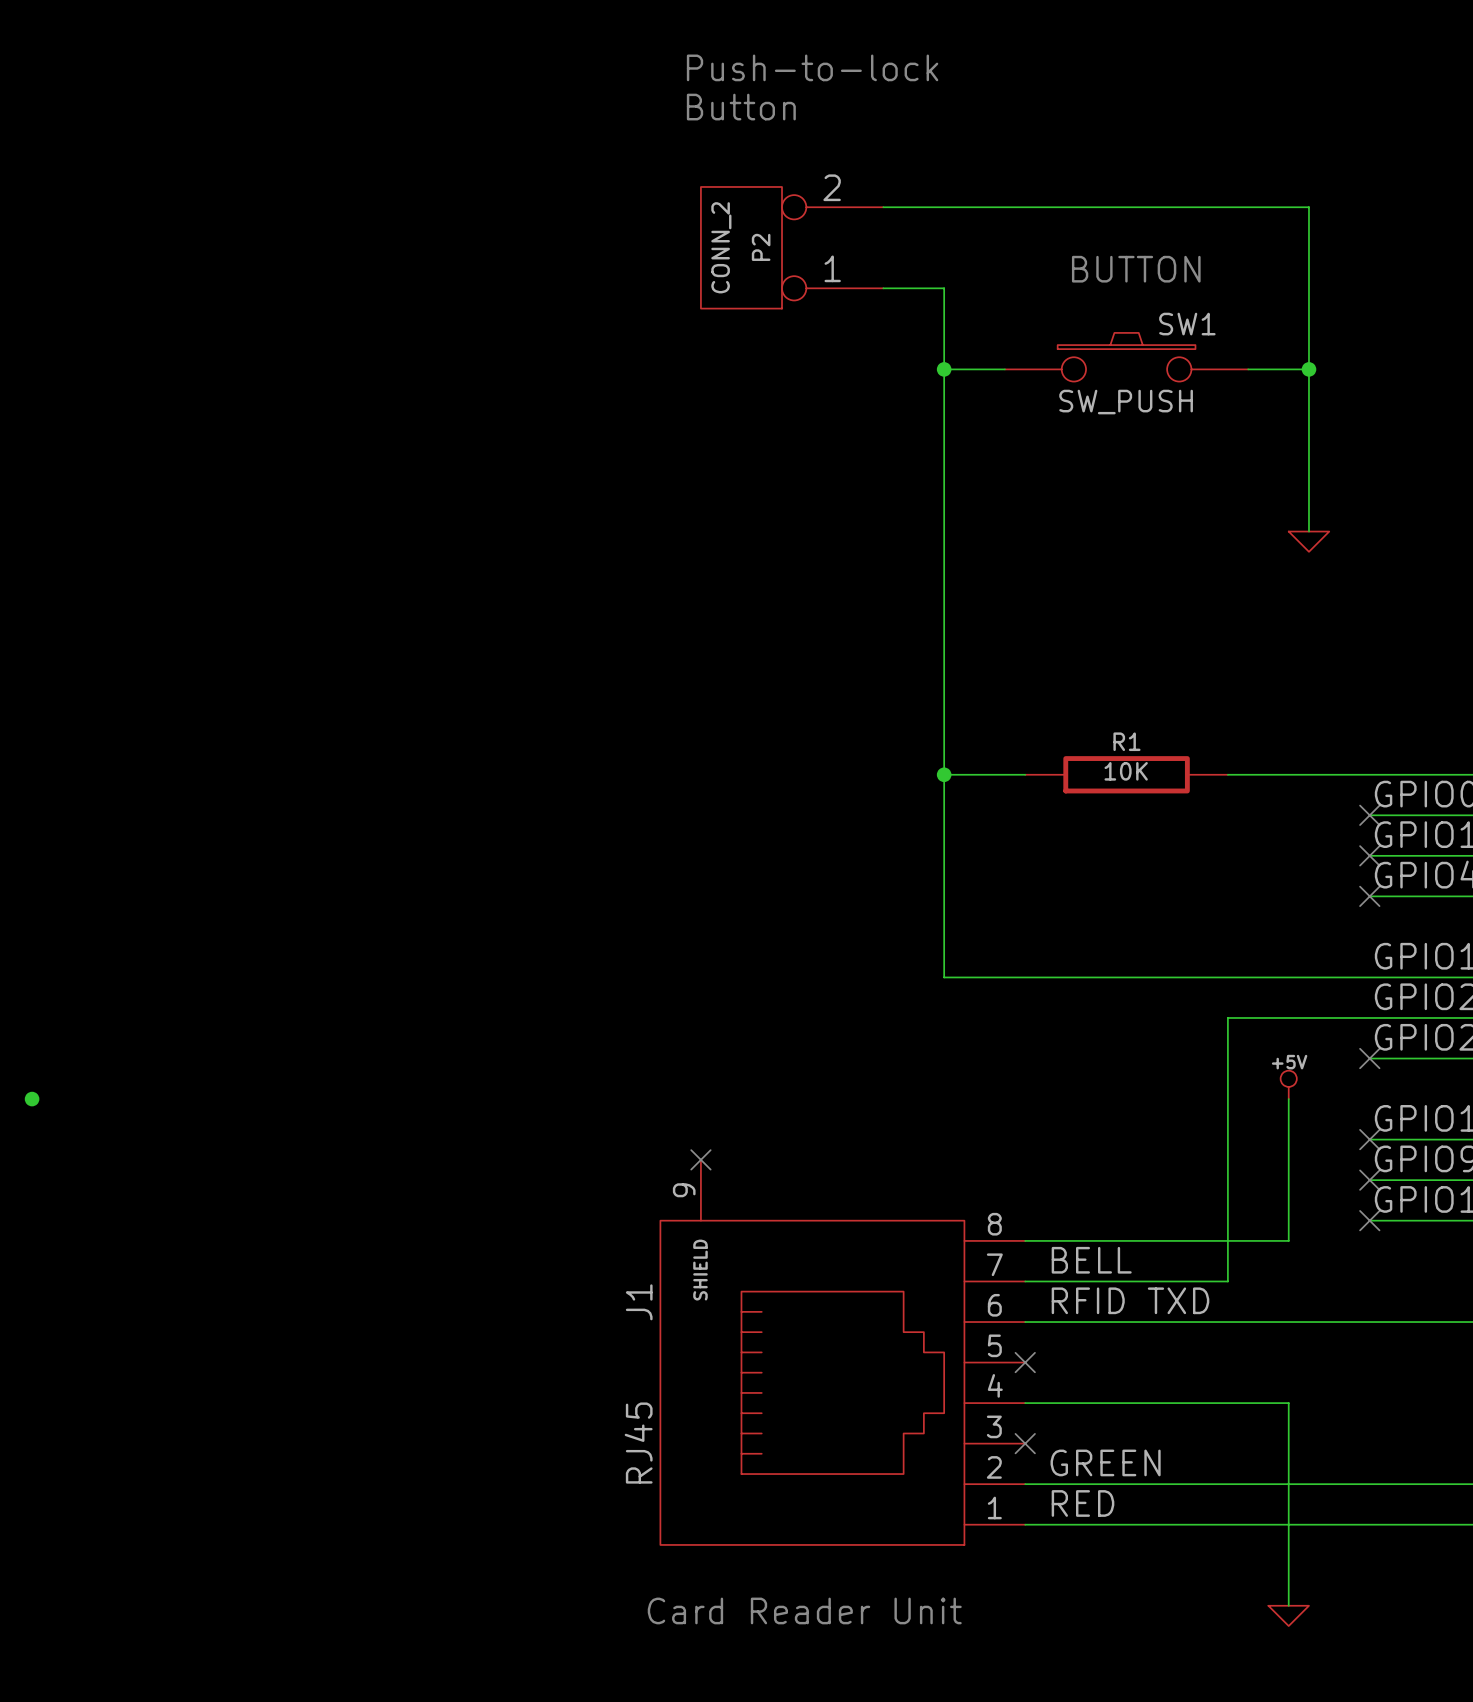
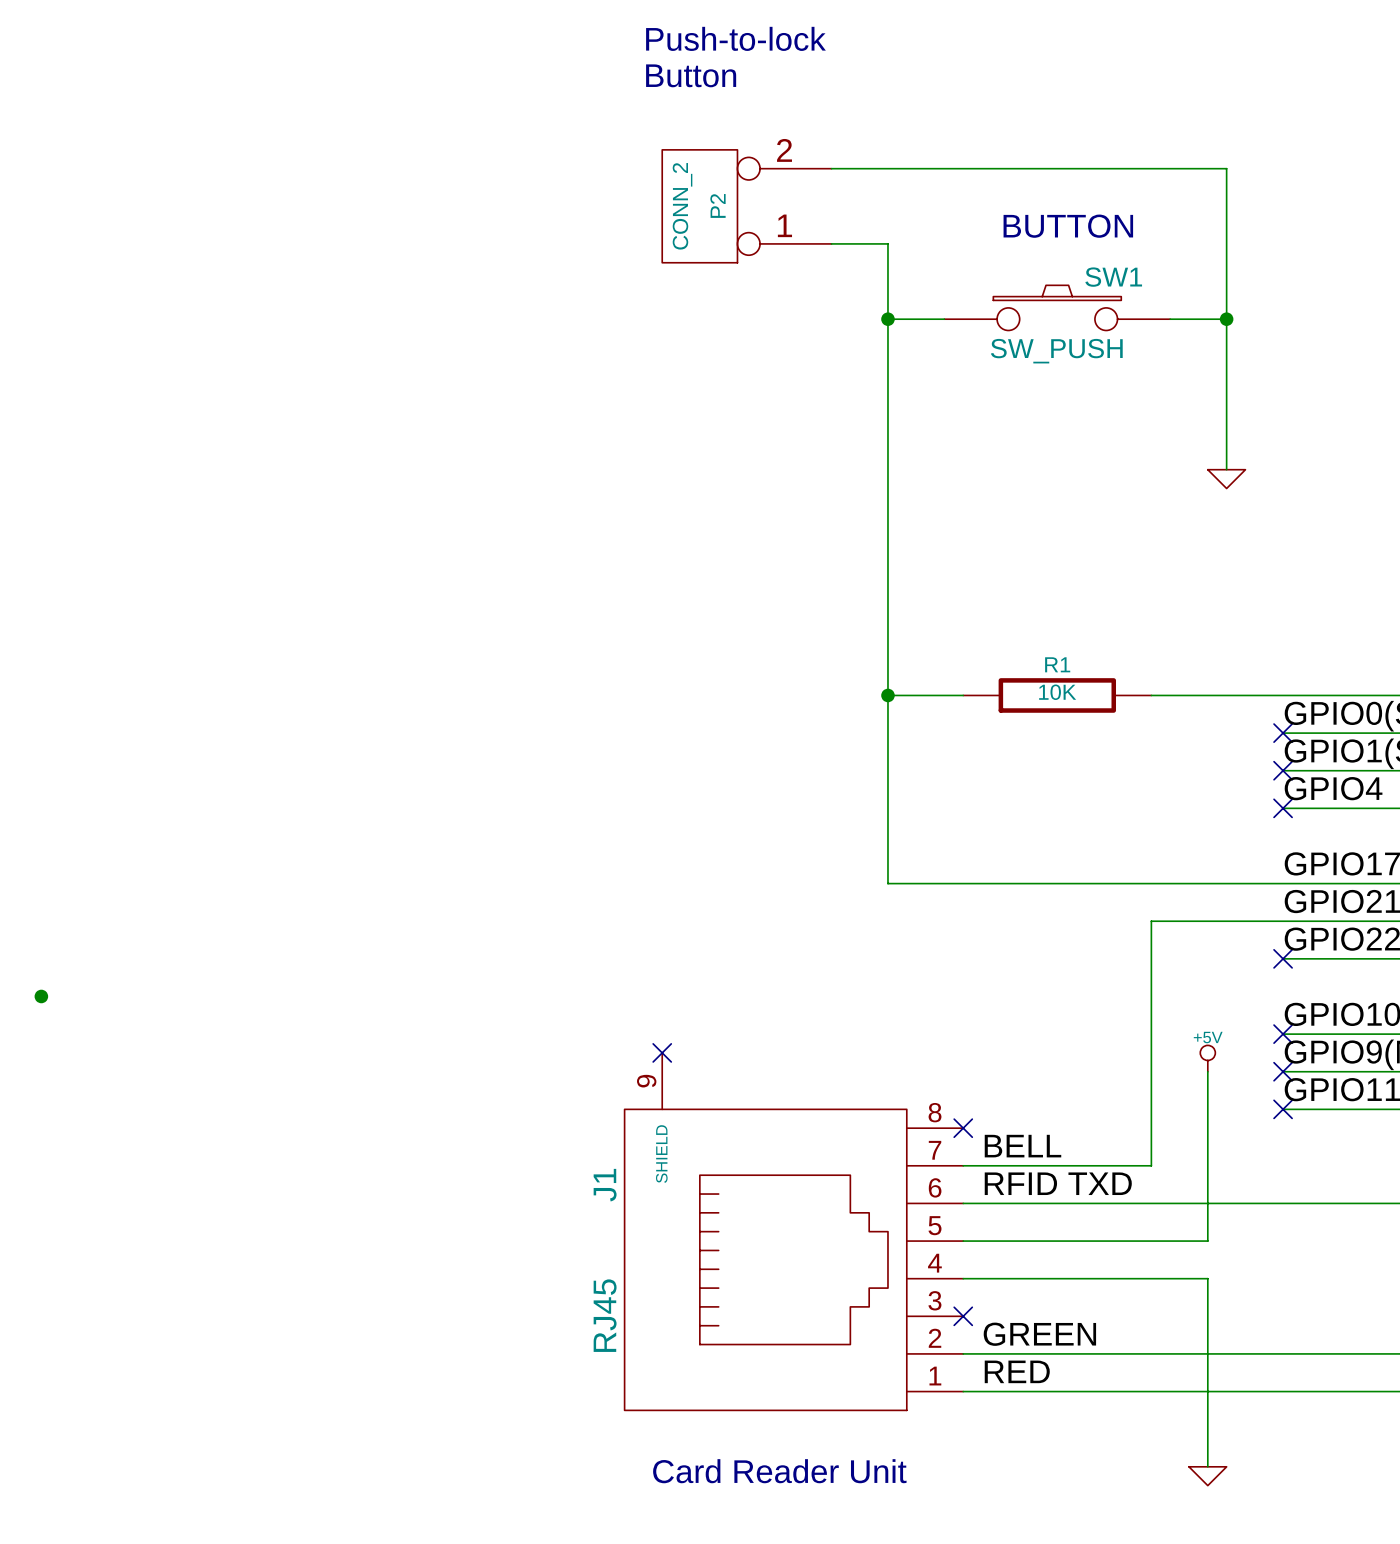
power symbol position: +5V (1288, 1084) -> +5V (1207, 1058)
wire: (1288, 1099) (1288, 1180) -> none
wire: (1025, 1240) (1288, 1240) -> (963, 1241) (1207, 1241) (1207, 1128)
no-connect mark: none -> (963, 1128)
no-connect mark: (1025, 1362) -> none

